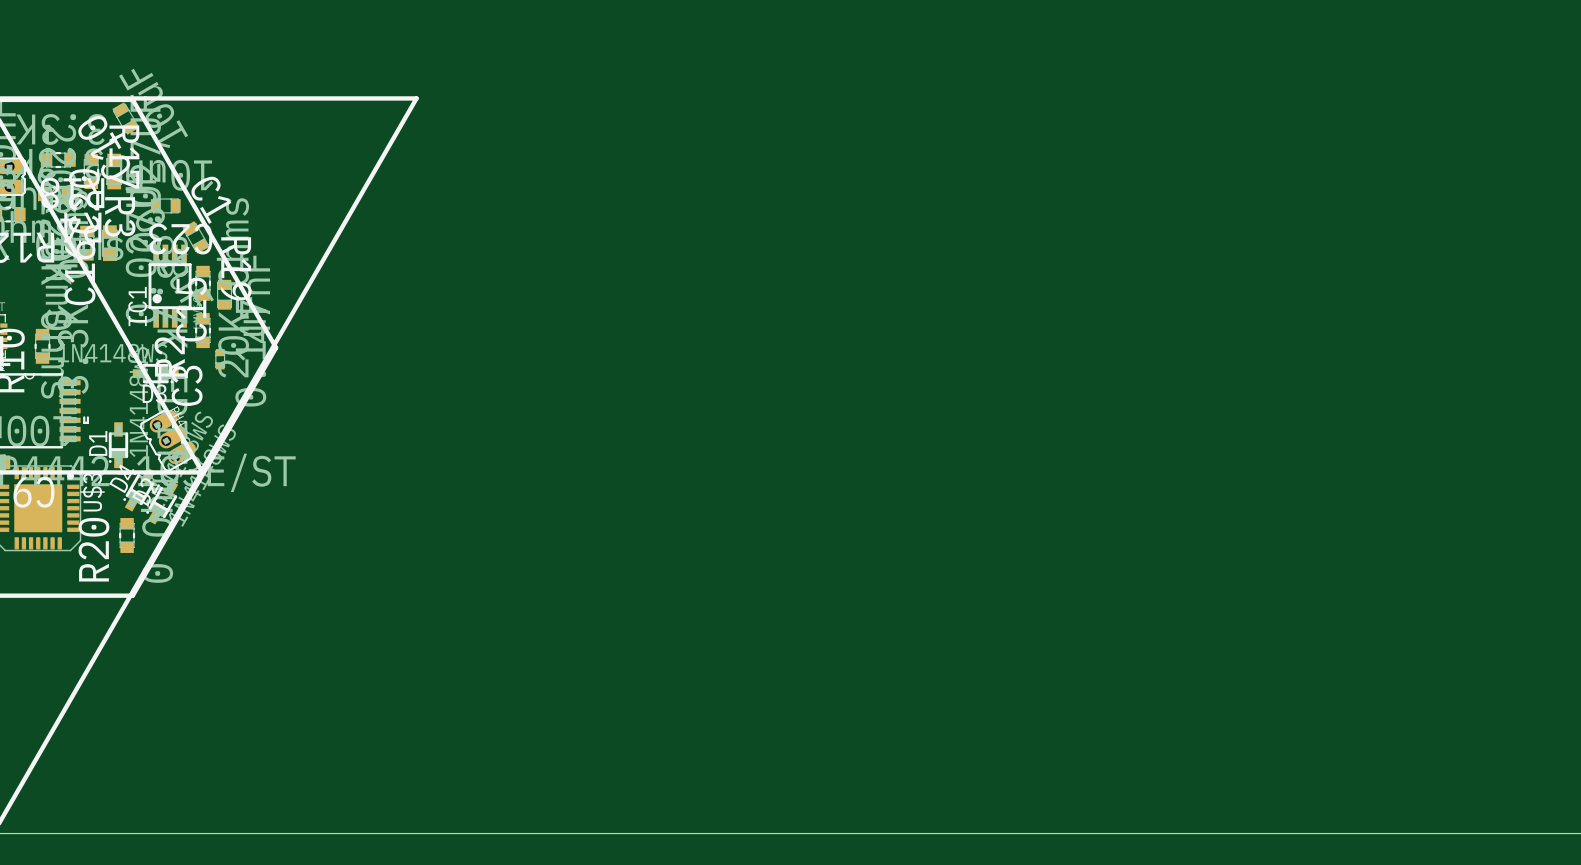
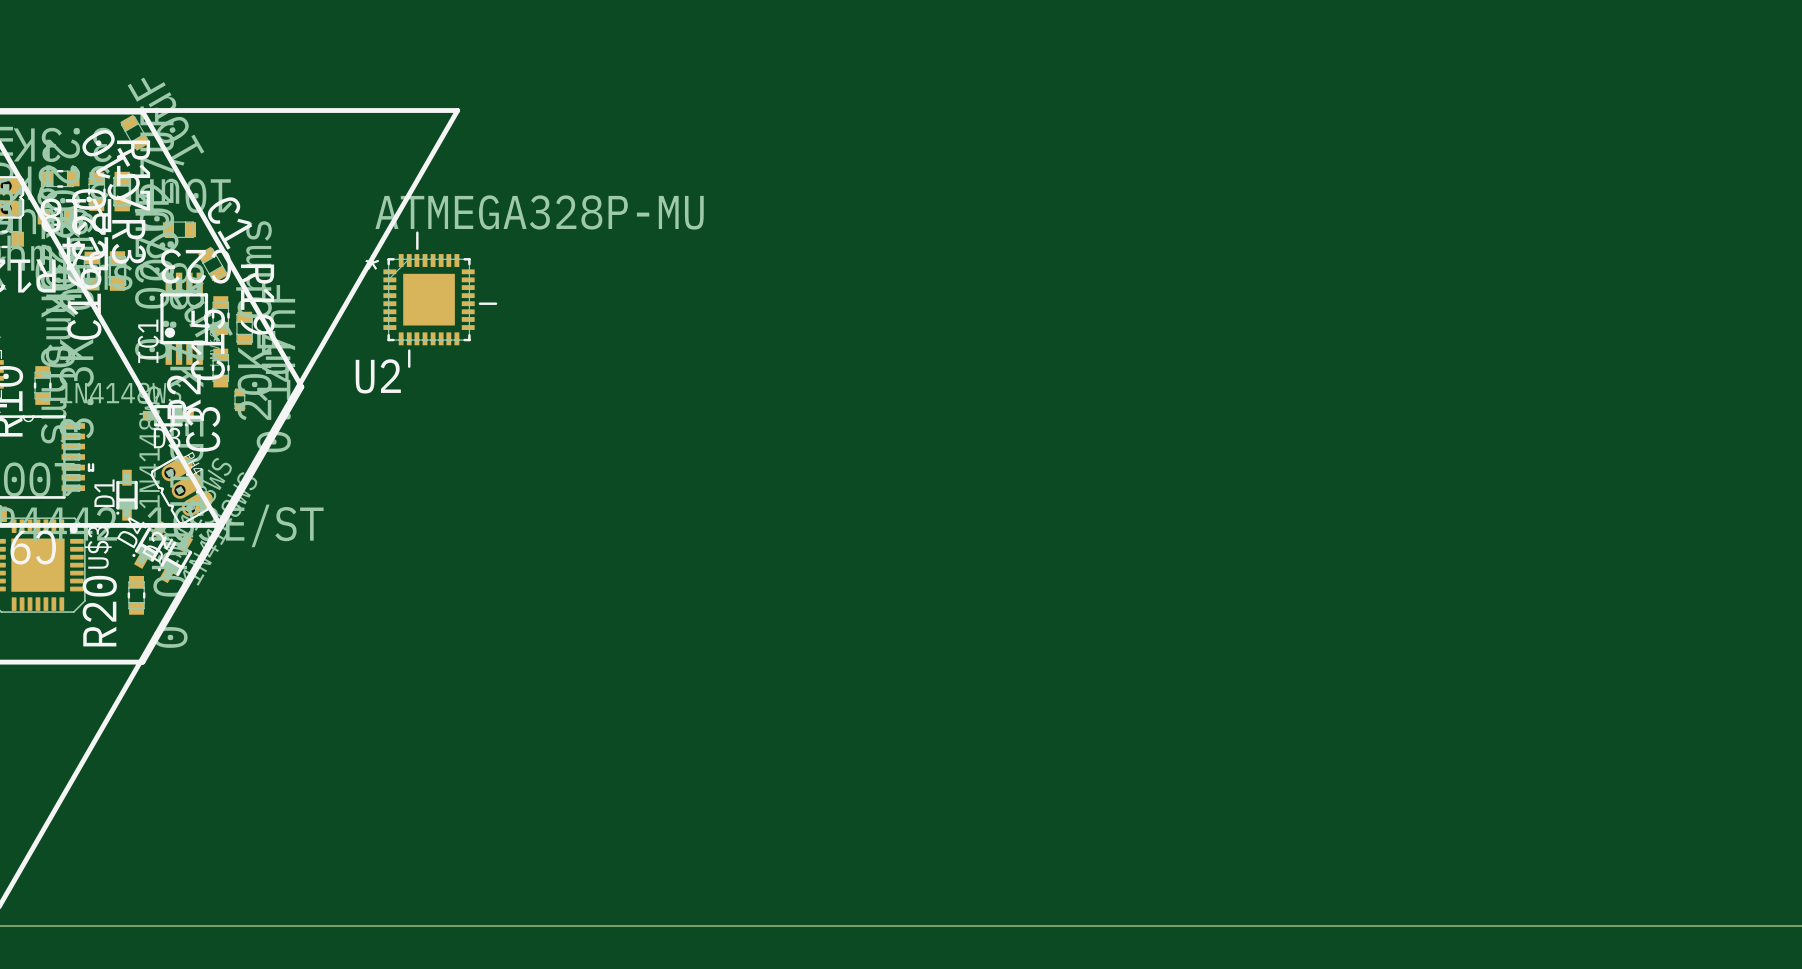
U2: none -> ATMEGA328P-MU (440, 299)

